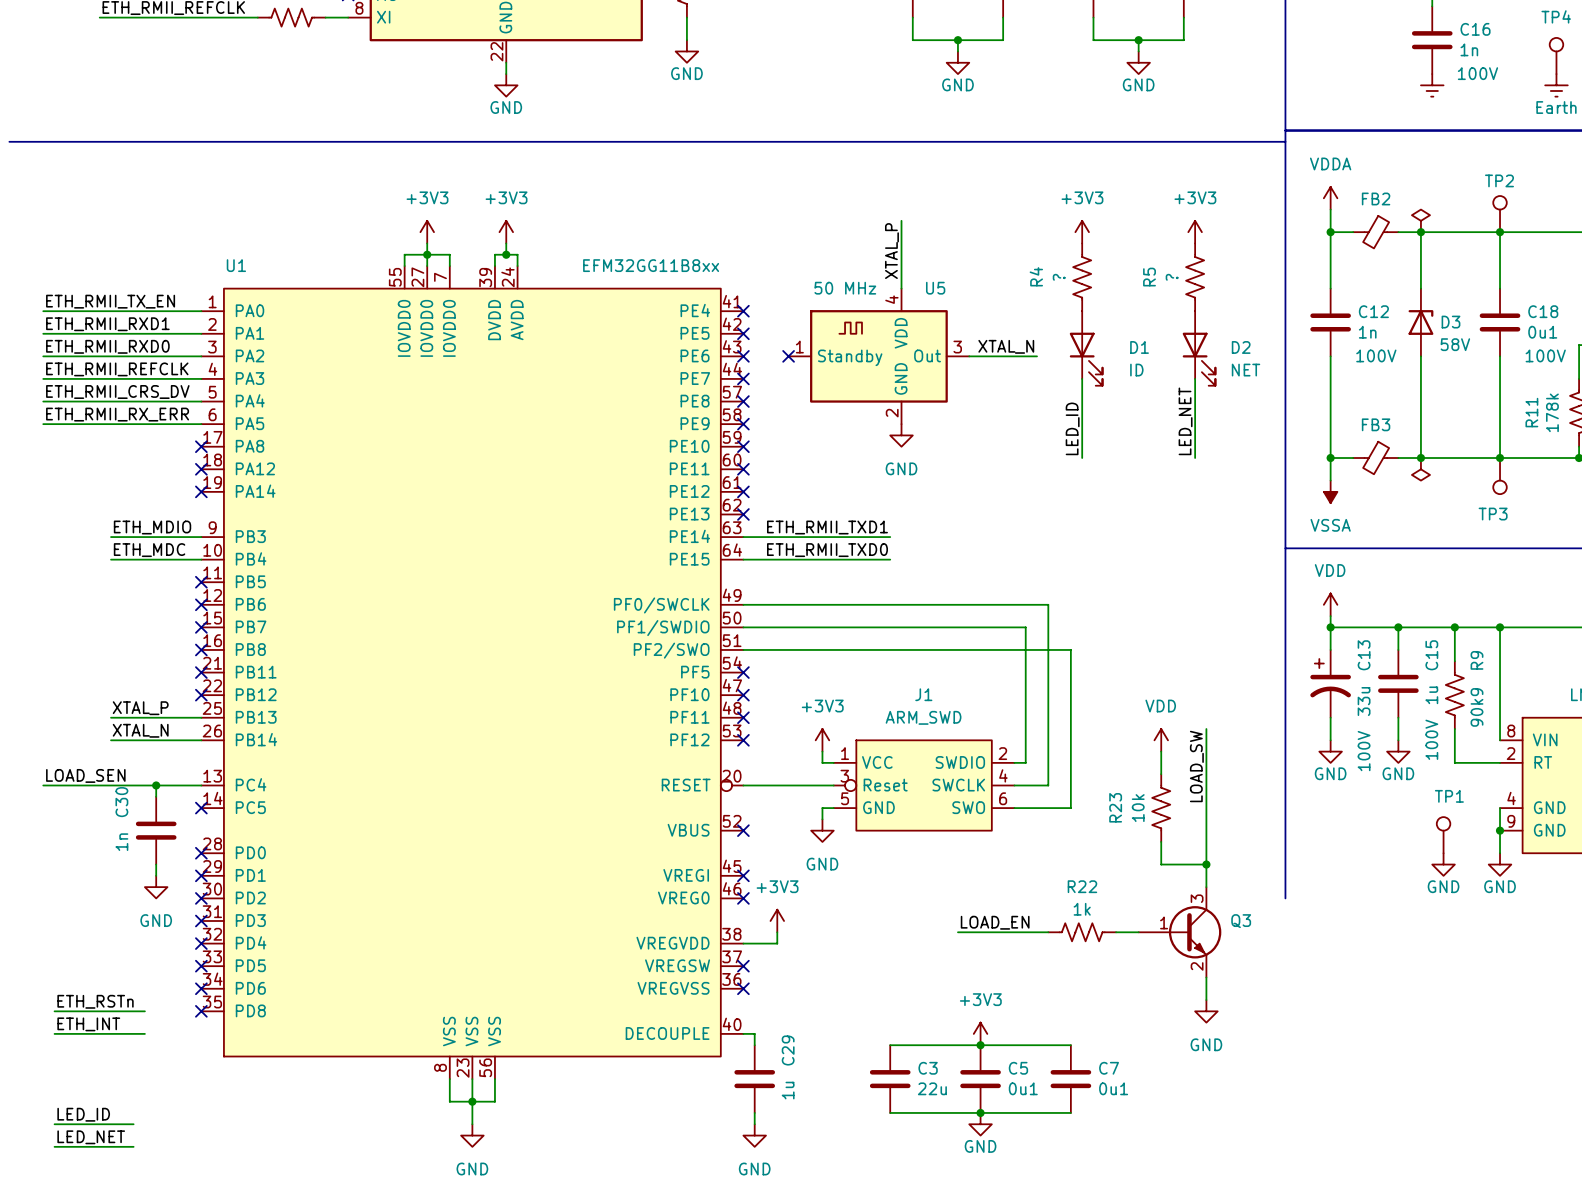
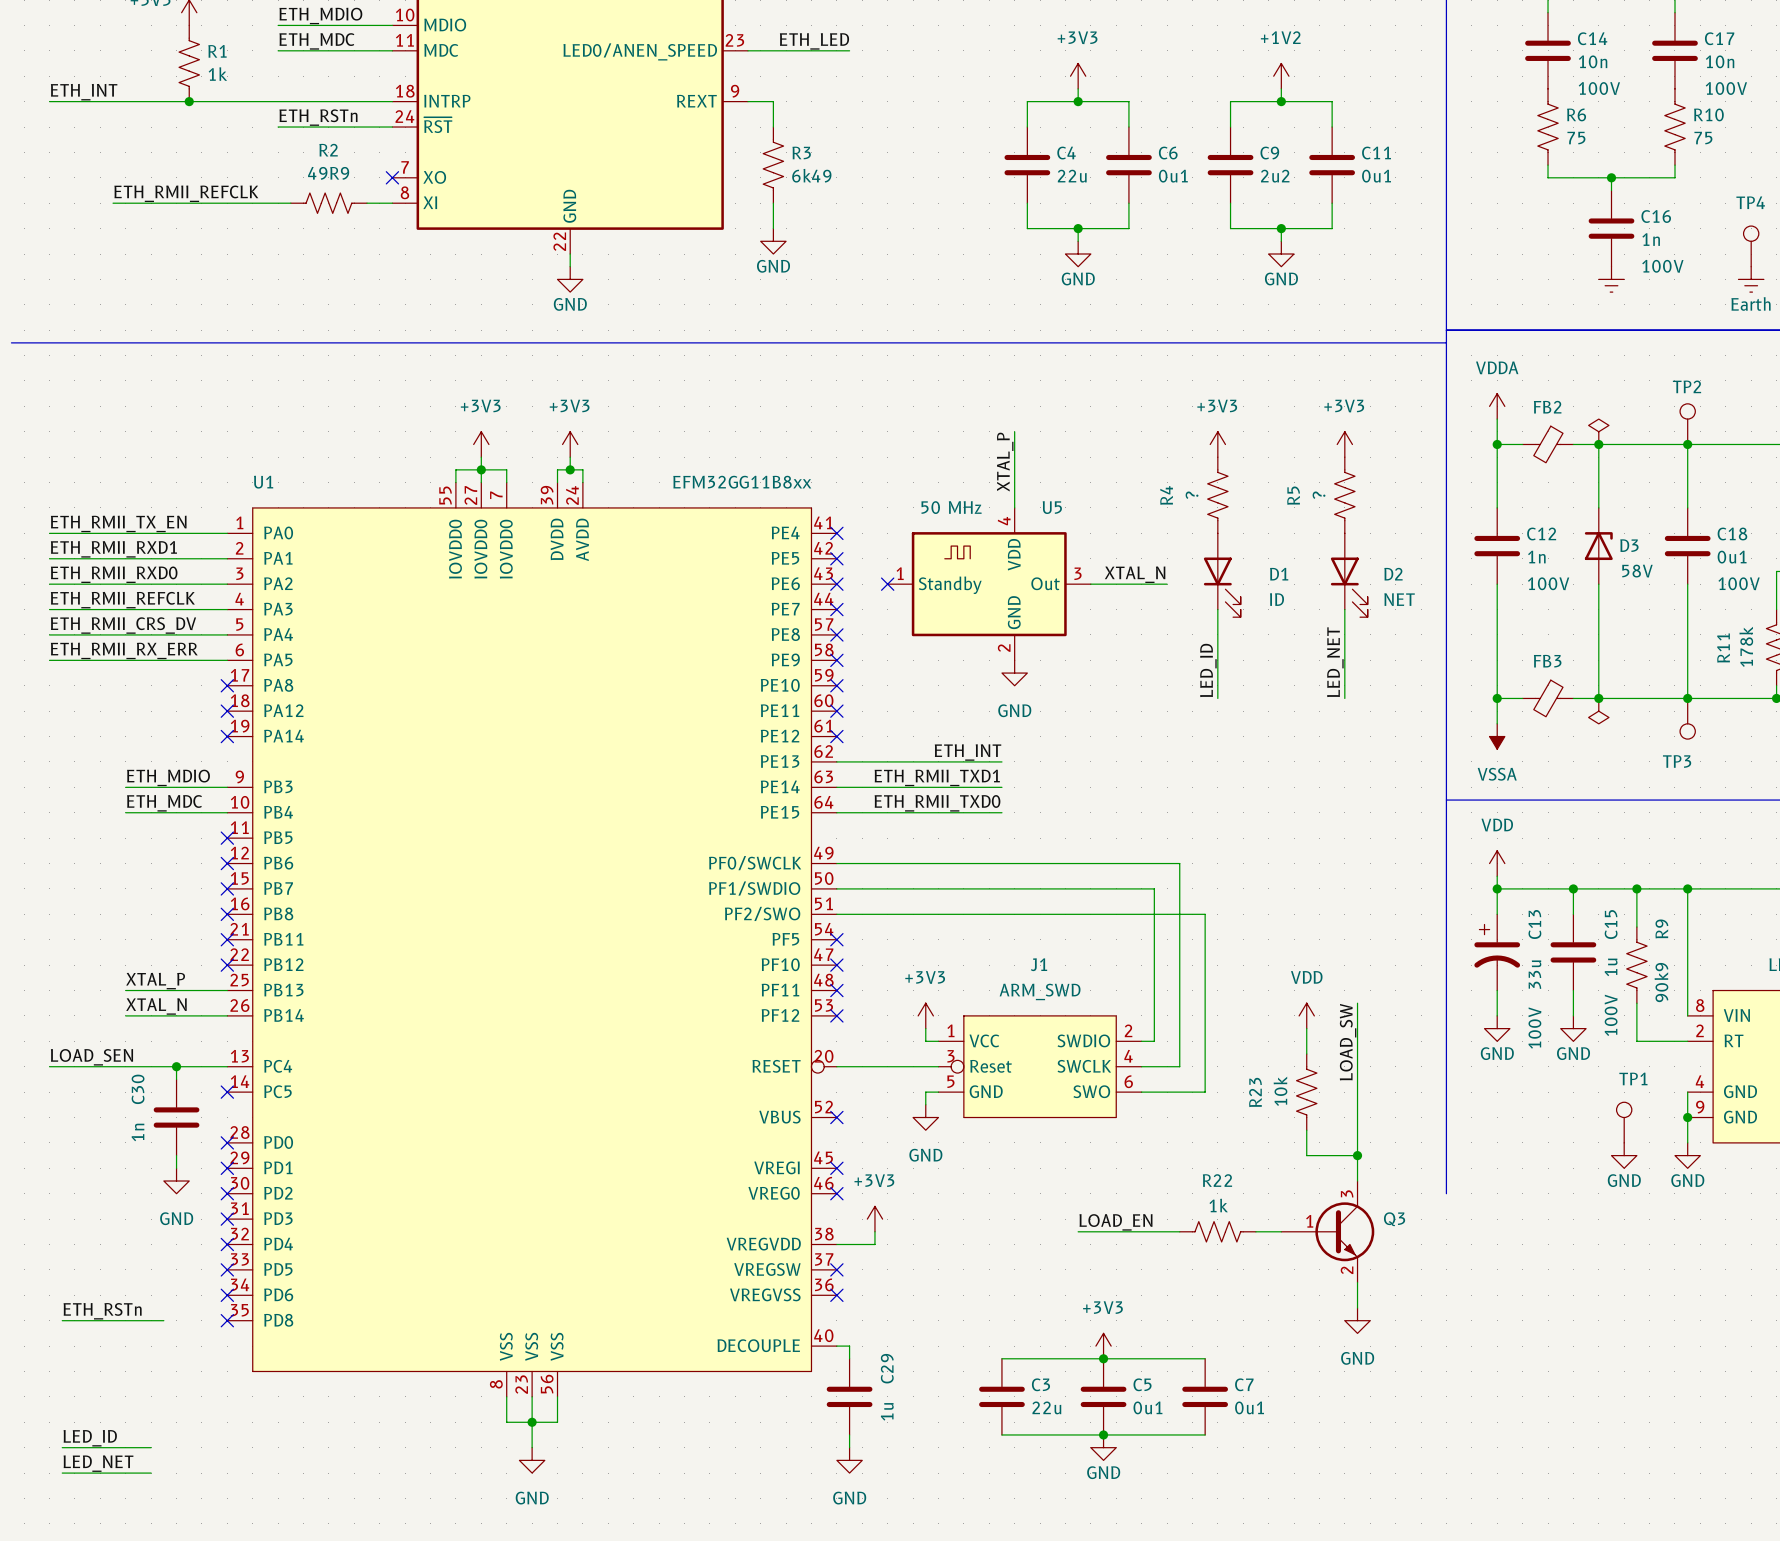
label: none -> ETH_INT (968, 752)
wire: none -> (836, 761) (1001, 761)
no-connect mark: (743, 514) -> none
label: ETH_INT (88, 1024) -> none
wire: (54, 1033) (144, 1033) -> none

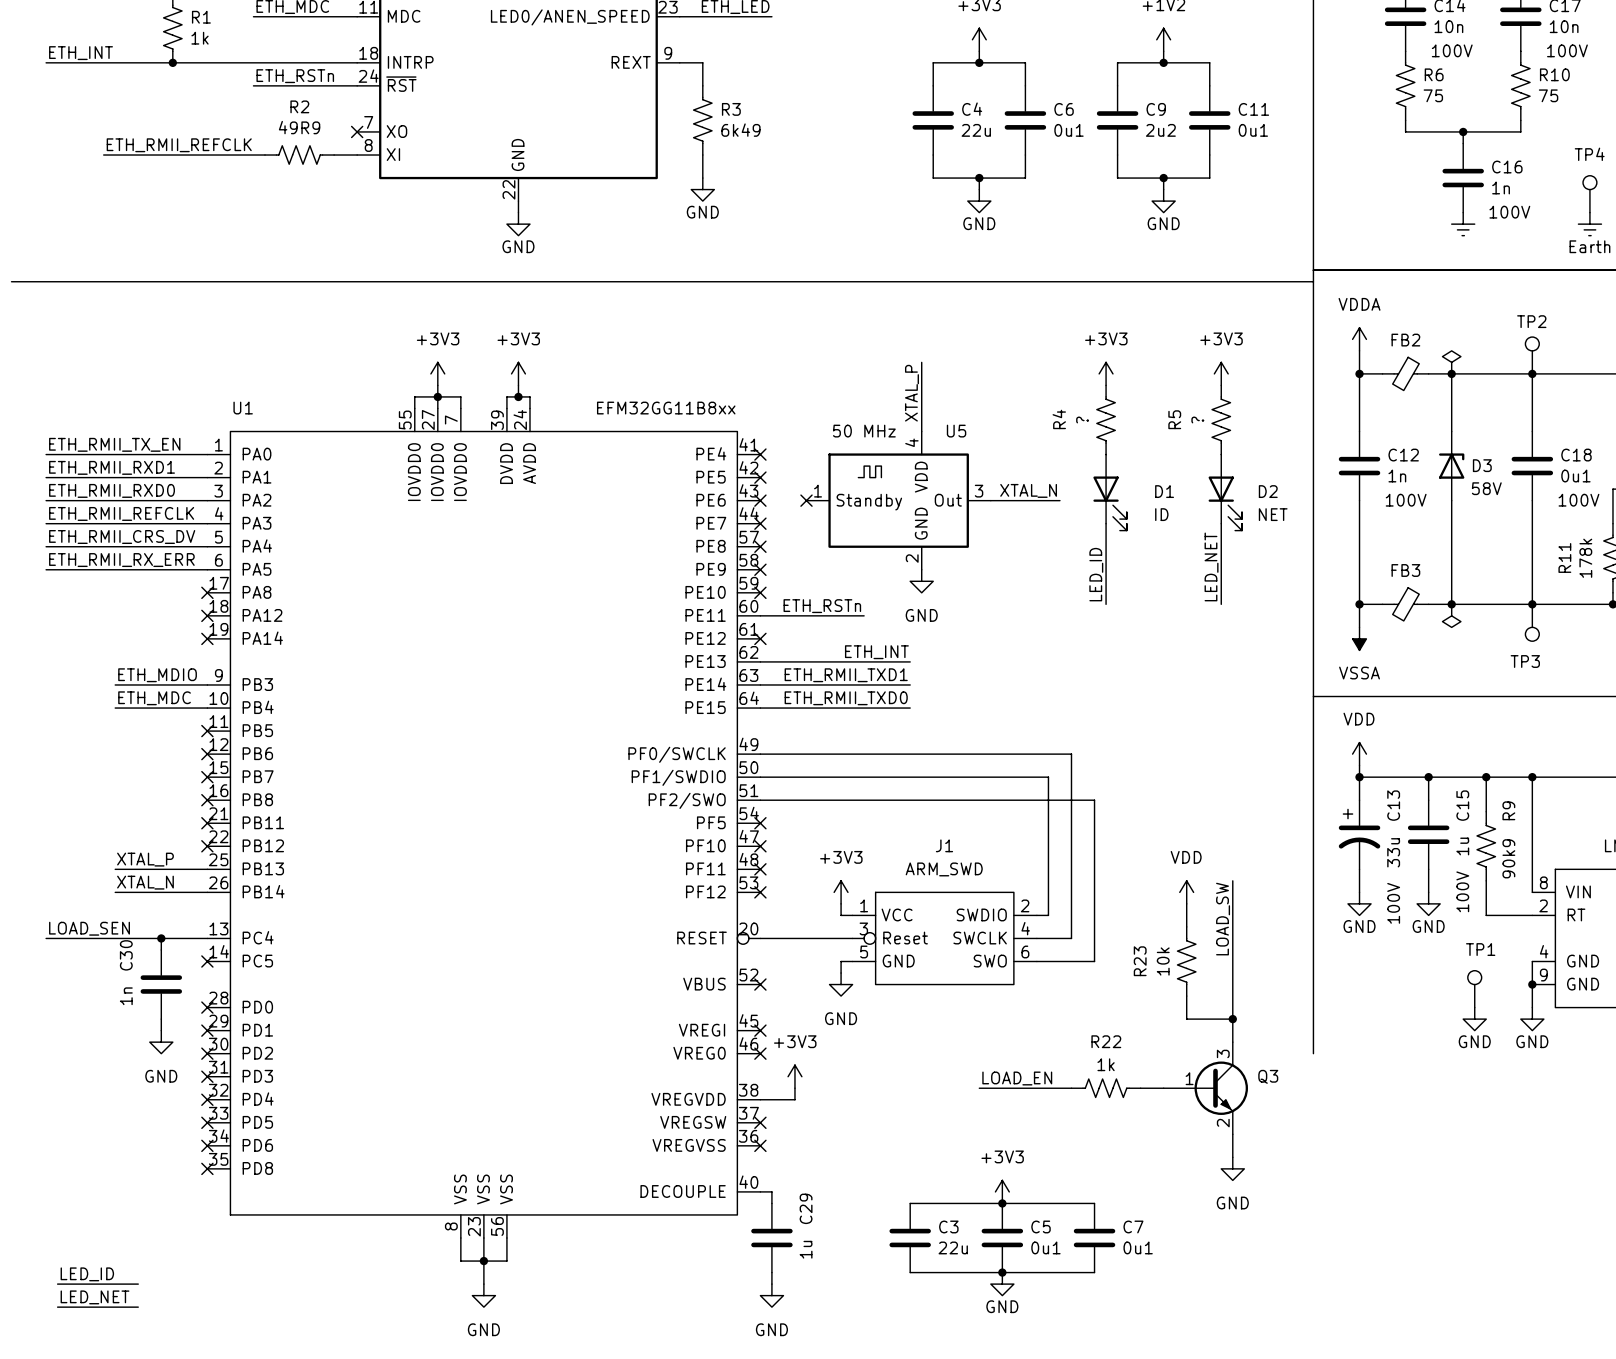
label: none -> ETH_RSTn (822, 606)
wire: none -> (760, 615) (864, 615)
no-connect mark: (836, 711) -> none
label: ETH_RSTn (102, 1311) -> none
wire: (62, 1320) (163, 1320) -> none

